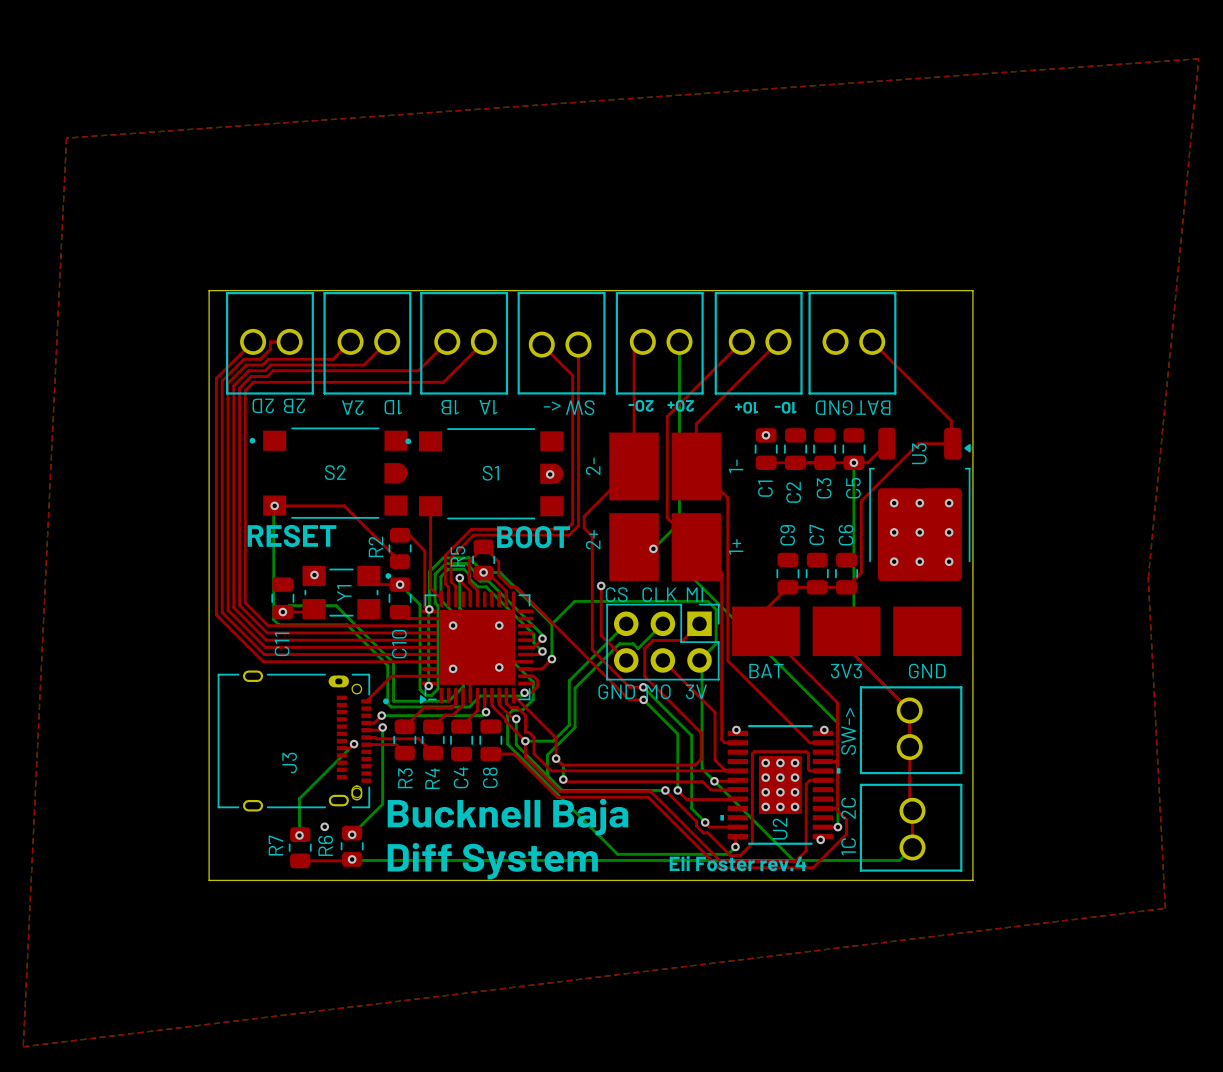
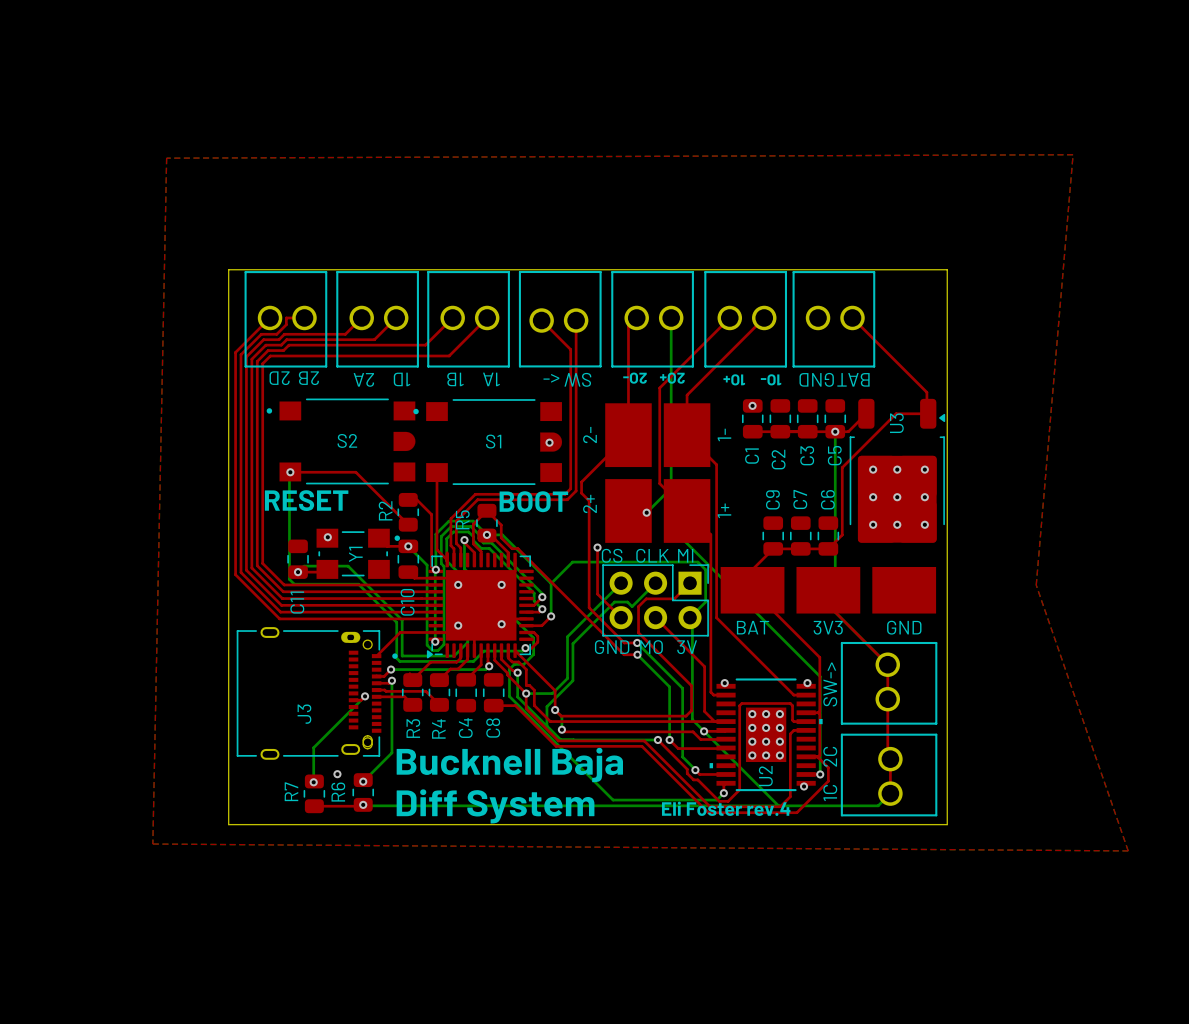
top zone outline: (1198, 58) (1148, 578) (1165, 908) (23, 1046) (66, 138) (1198, 58) -> (1073, 154) (166, 158) (152, 844) (1128, 850) (1036, 585) (1073, 154)

